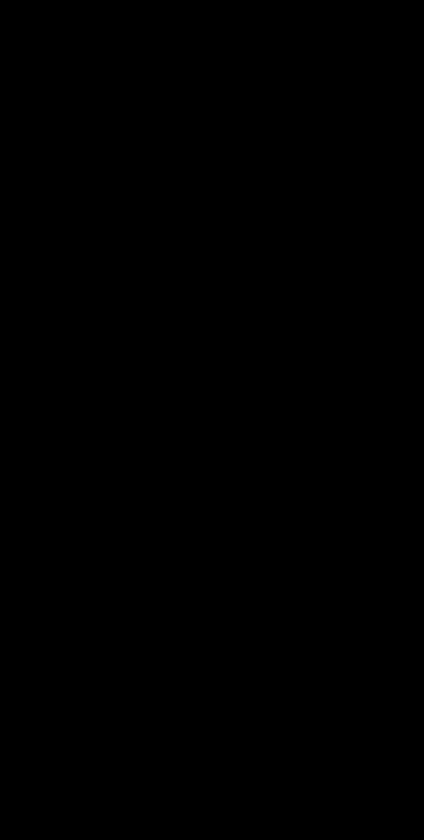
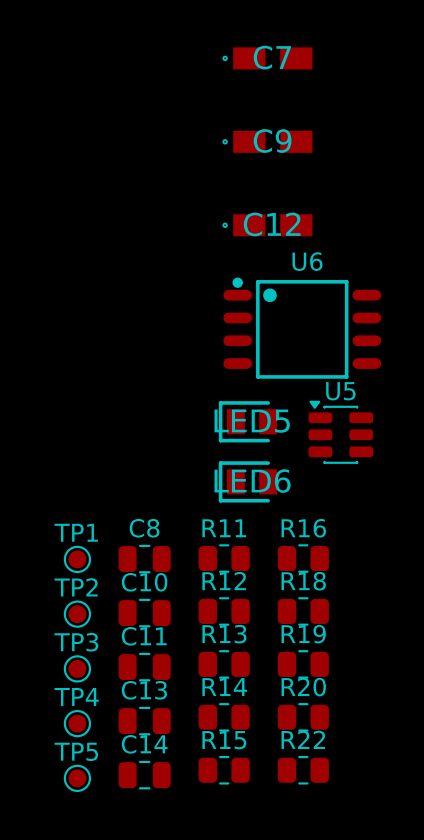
C7: none -> (267, 58)
C9: none -> (267, 141)
C12: none -> (267, 225)
U6: none -> (302, 328)
LED5: none -> (247, 421)
U5: none -> (340, 432)
LED6: none -> (247, 481)
R11: none -> (224, 558)
R16: none -> (303, 558)
TP1: none -> (77, 559)
C8: none -> (144, 559)
R12: none -> (224, 611)
R18: none -> (303, 611)
C10: none -> (144, 613)
TP2: none -> (77, 614)
R13: none -> (224, 664)
R19: none -> (303, 664)
C11: none -> (144, 667)
TP3: none -> (77, 668)
R14: none -> (224, 717)
R20: none -> (303, 717)
C13: none -> (144, 721)
TP4: none -> (77, 723)
R15: none -> (224, 770)
R22: none -> (303, 770)
C14: none -> (144, 775)
TP5: none -> (77, 778)

